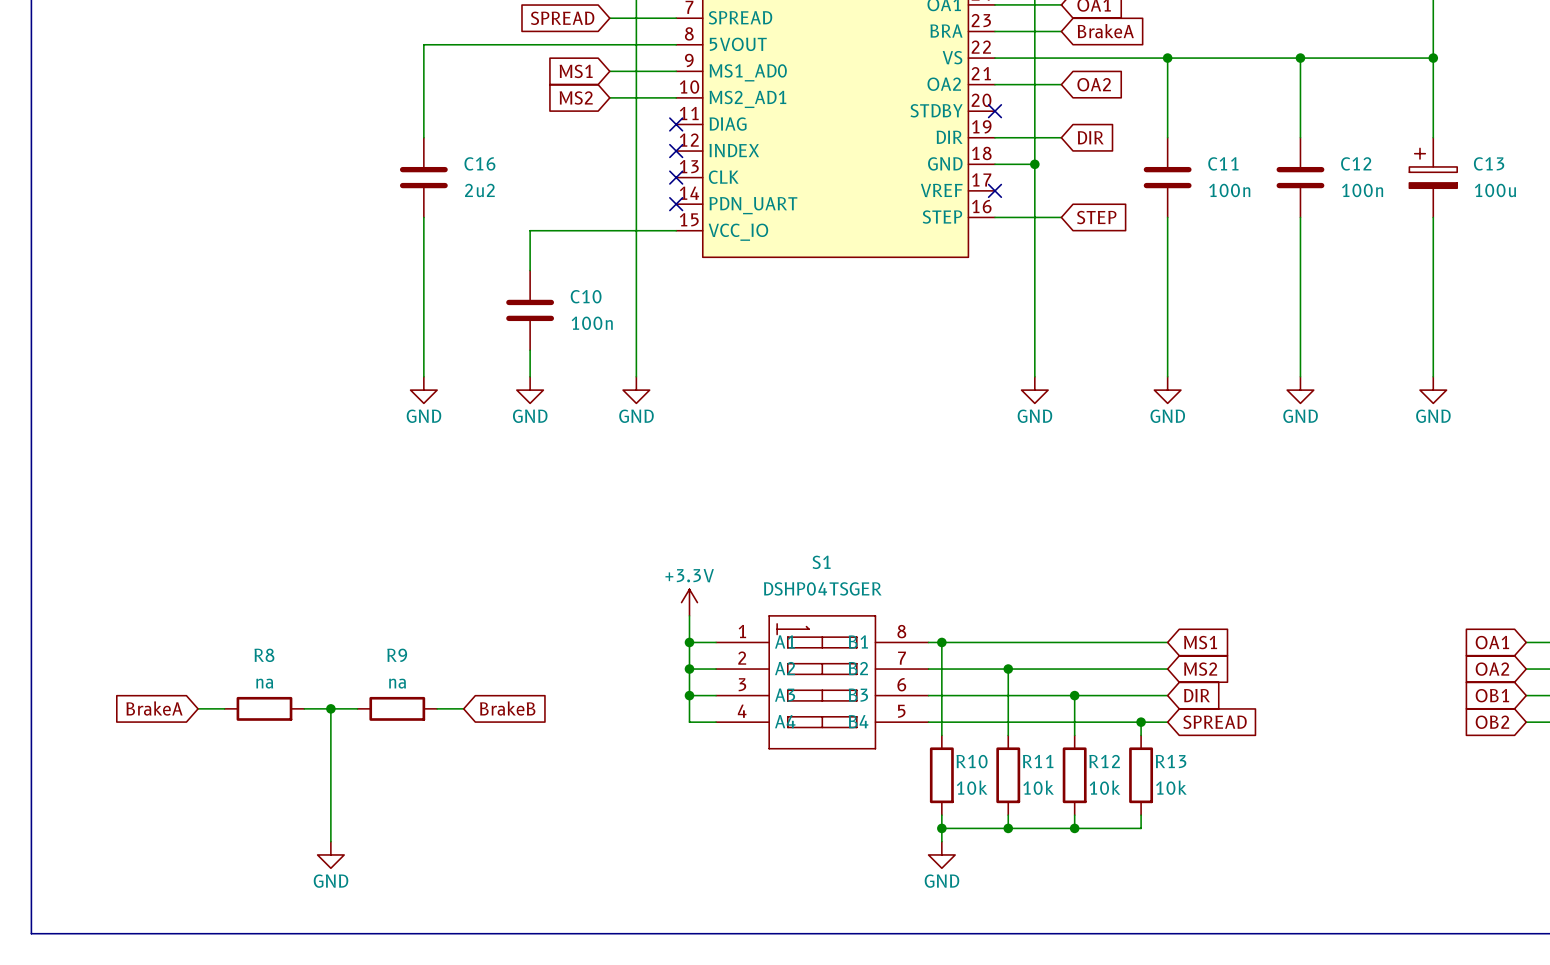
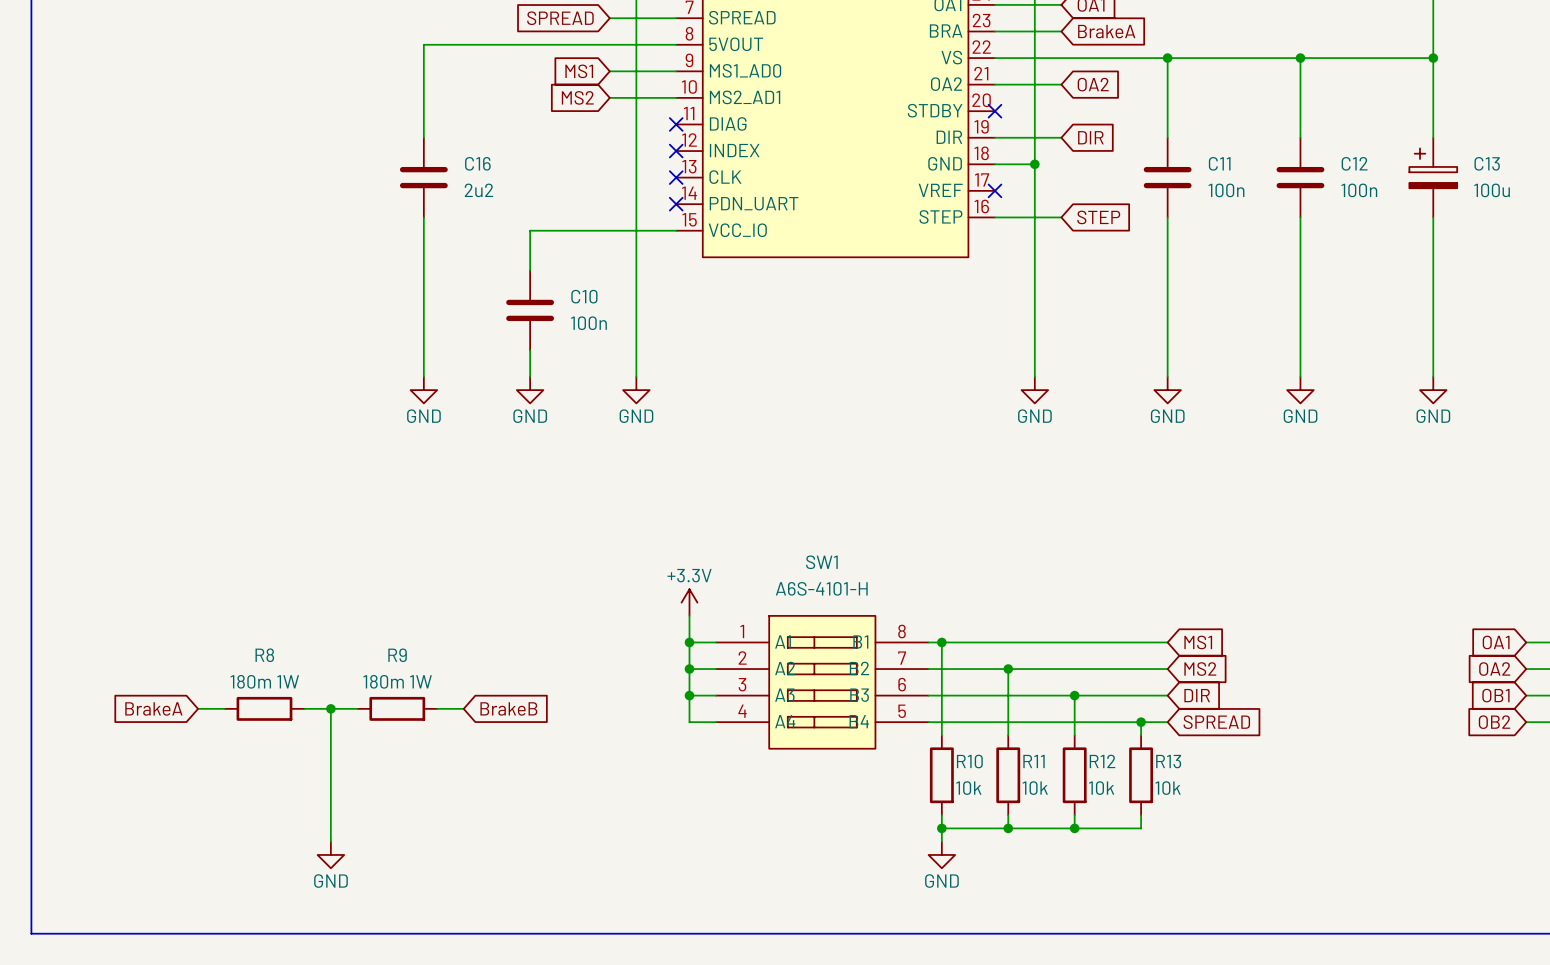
S1: DSHP04TSGER (822, 682) -> none
SW1: none -> A6S-4101-H (822, 682)
R8 value: na (264, 683) -> 180m 1W (264, 681)
R9 value: na (397, 683) -> 180m 1W (397, 681)

